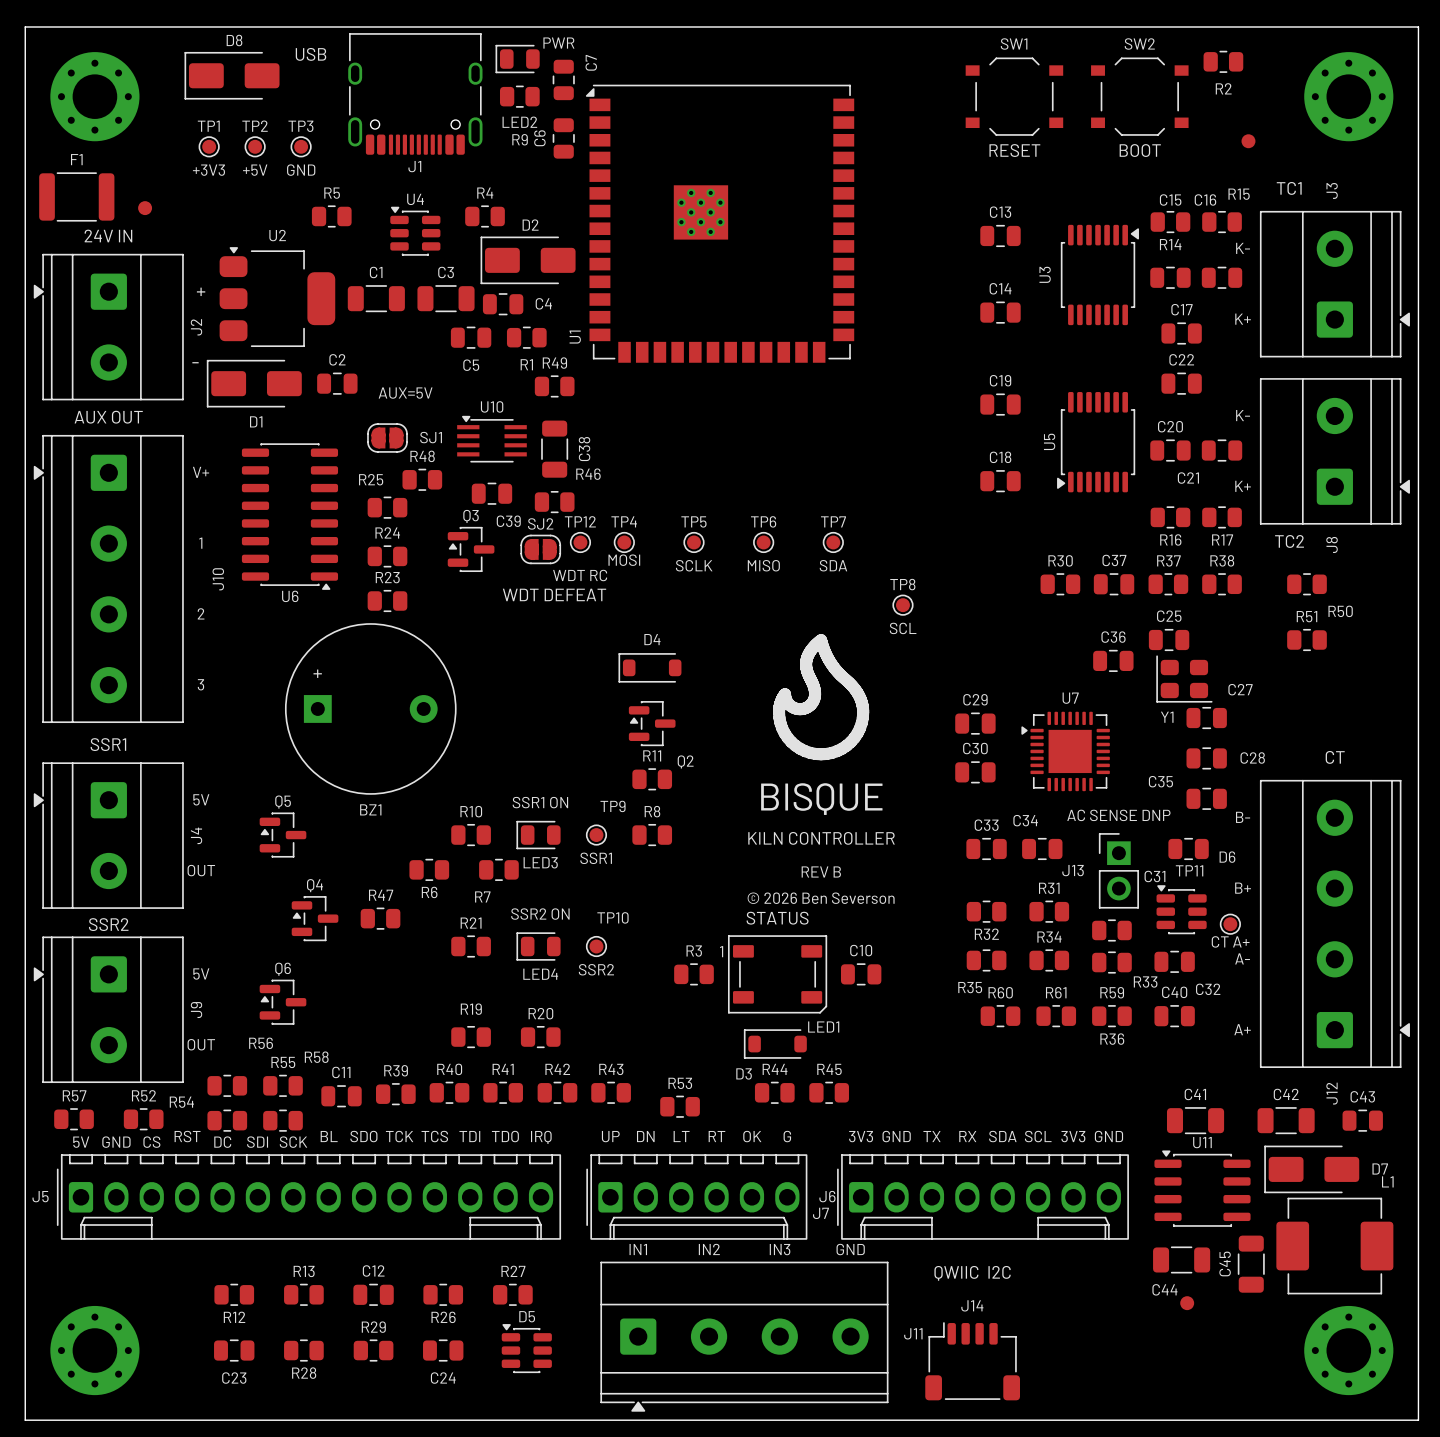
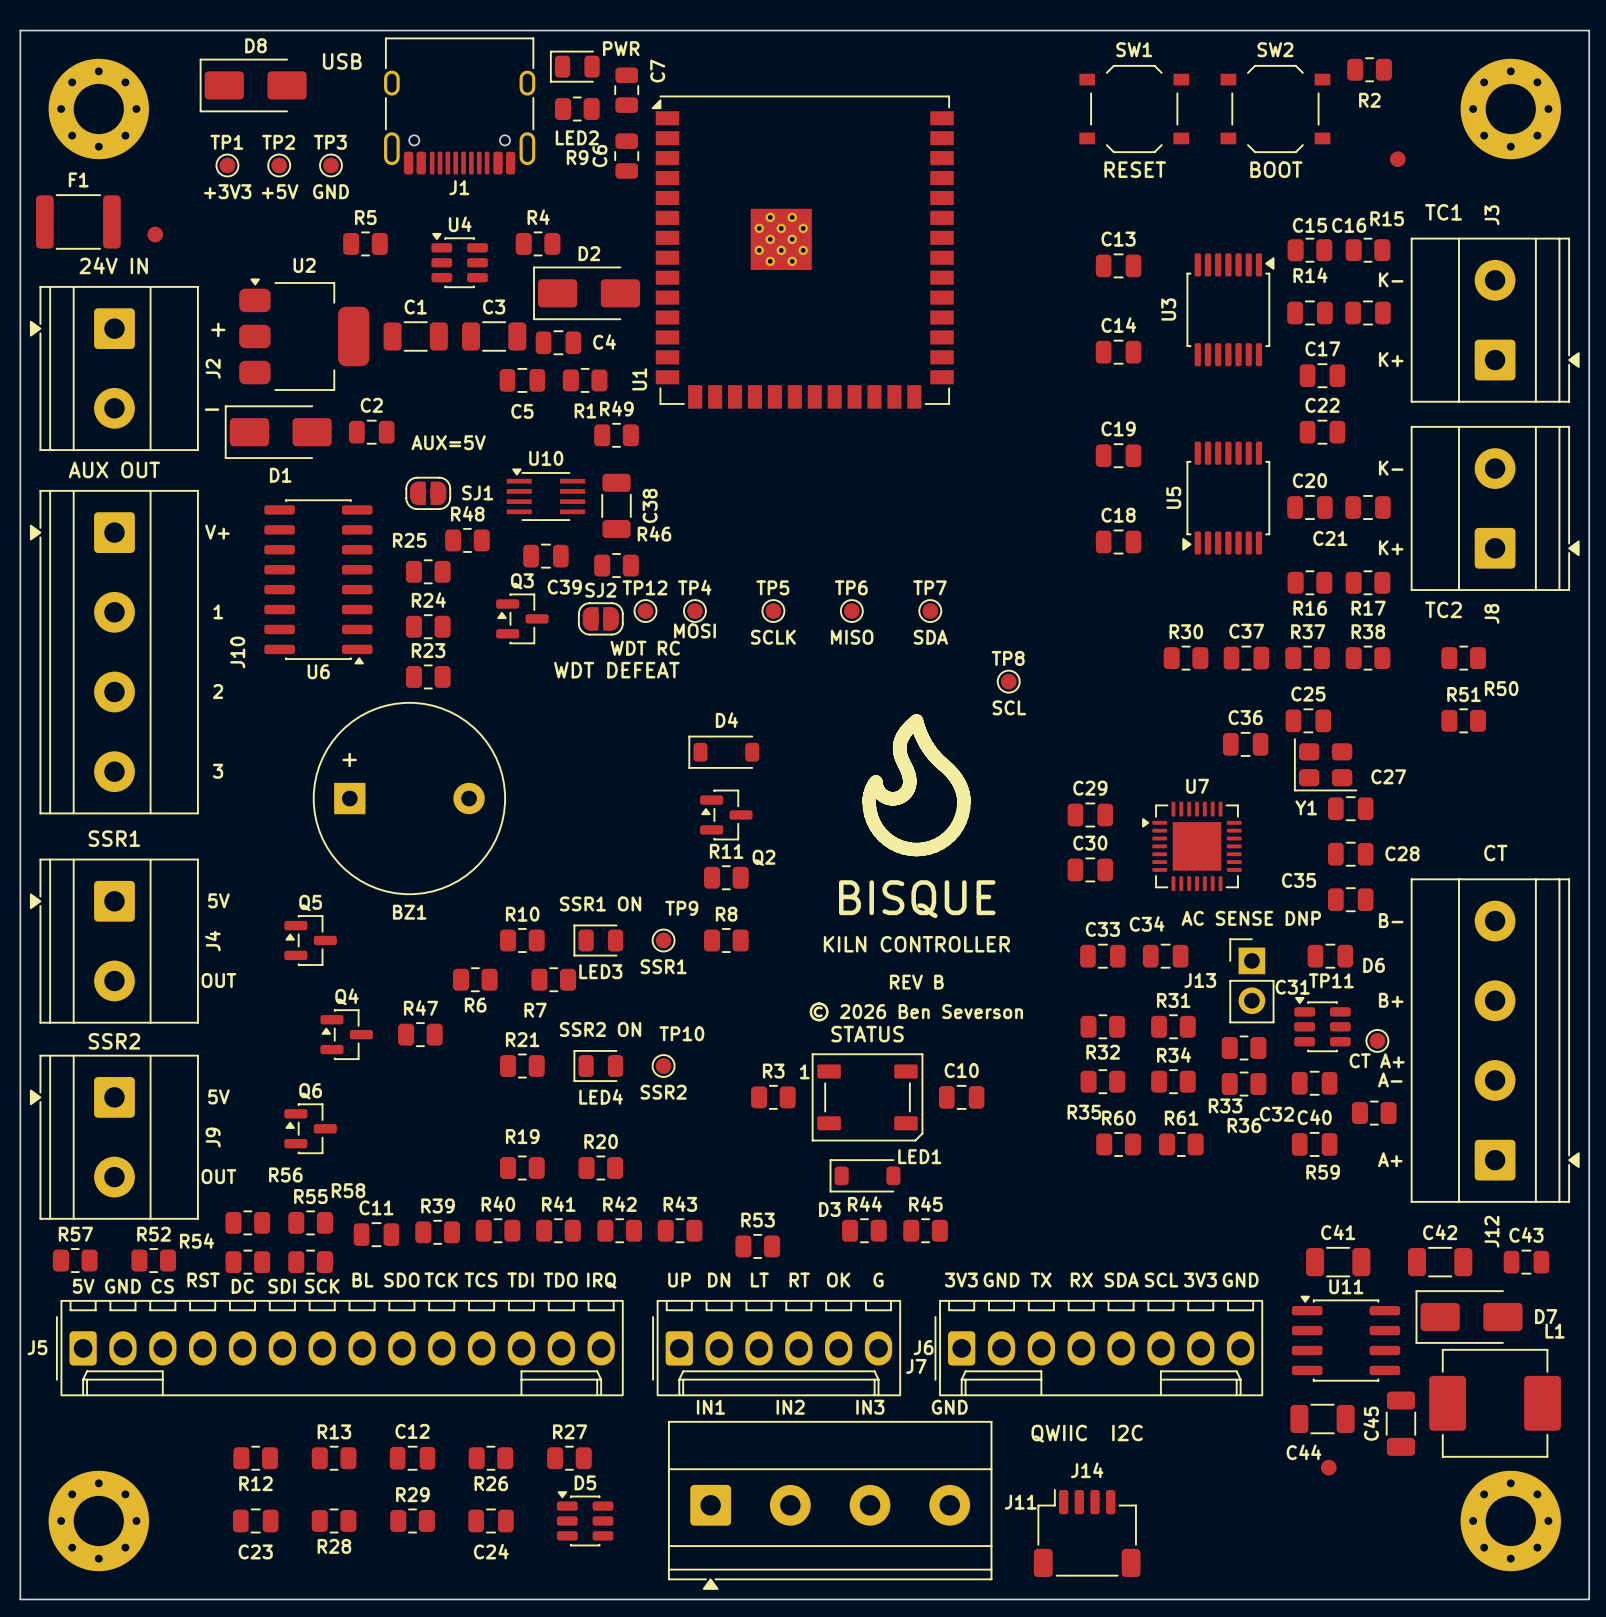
R33 name position: R33 (1145, 982) -> R33 (1225, 1105)
C32 name position: C32 (1208, 989) -> C32 (1277, 1114)
R59 name position: R59 (1112, 992) -> R59 (1323, 1172)
R59 position: (1111, 1016) -> (1374, 1113)
R36 name position: R36 (1112, 1039) -> R36 (1244, 1125)

